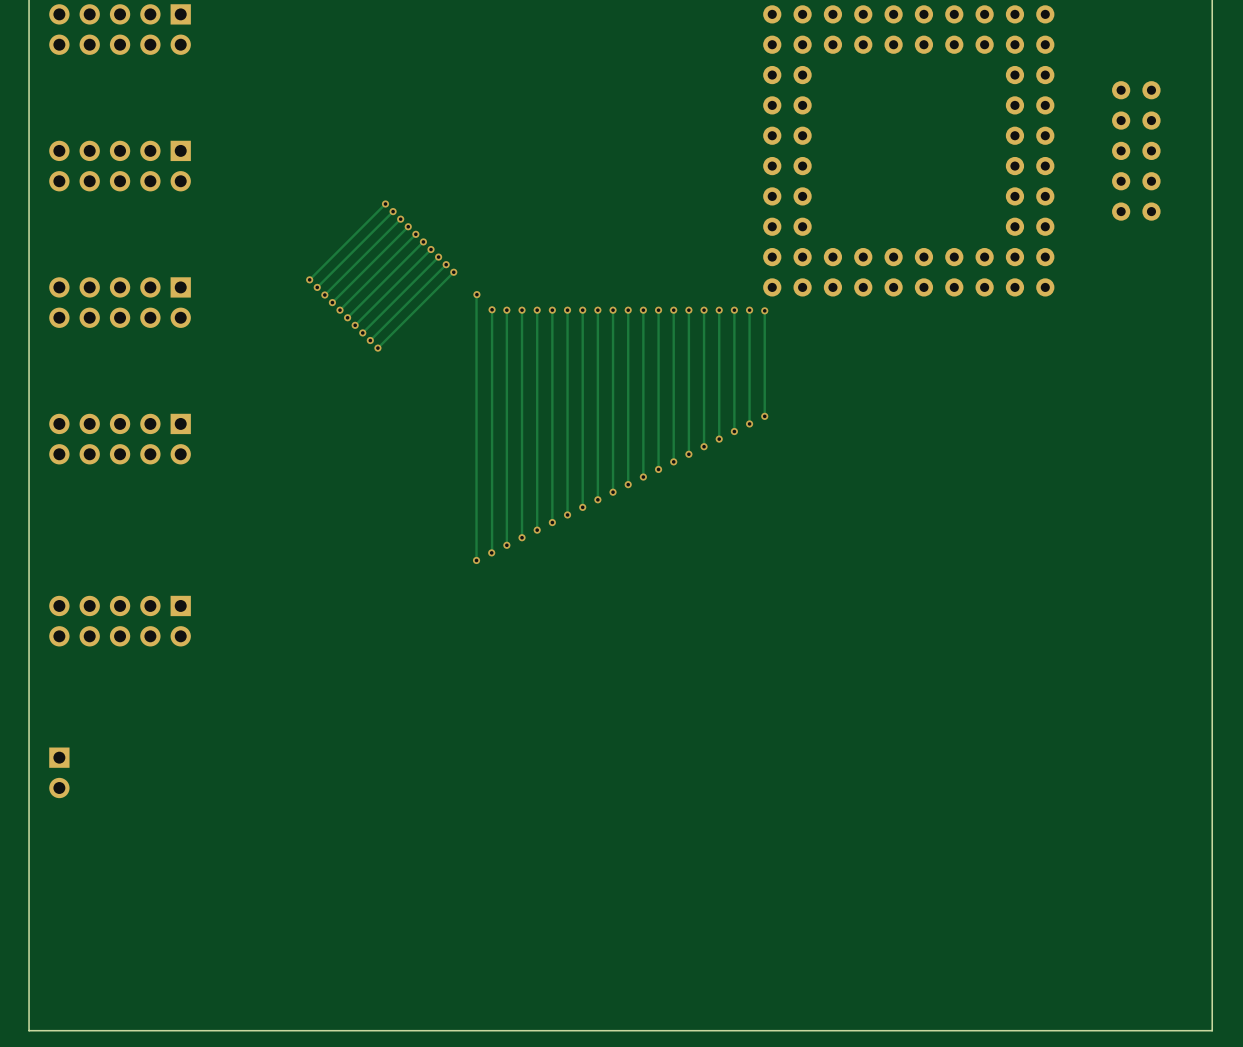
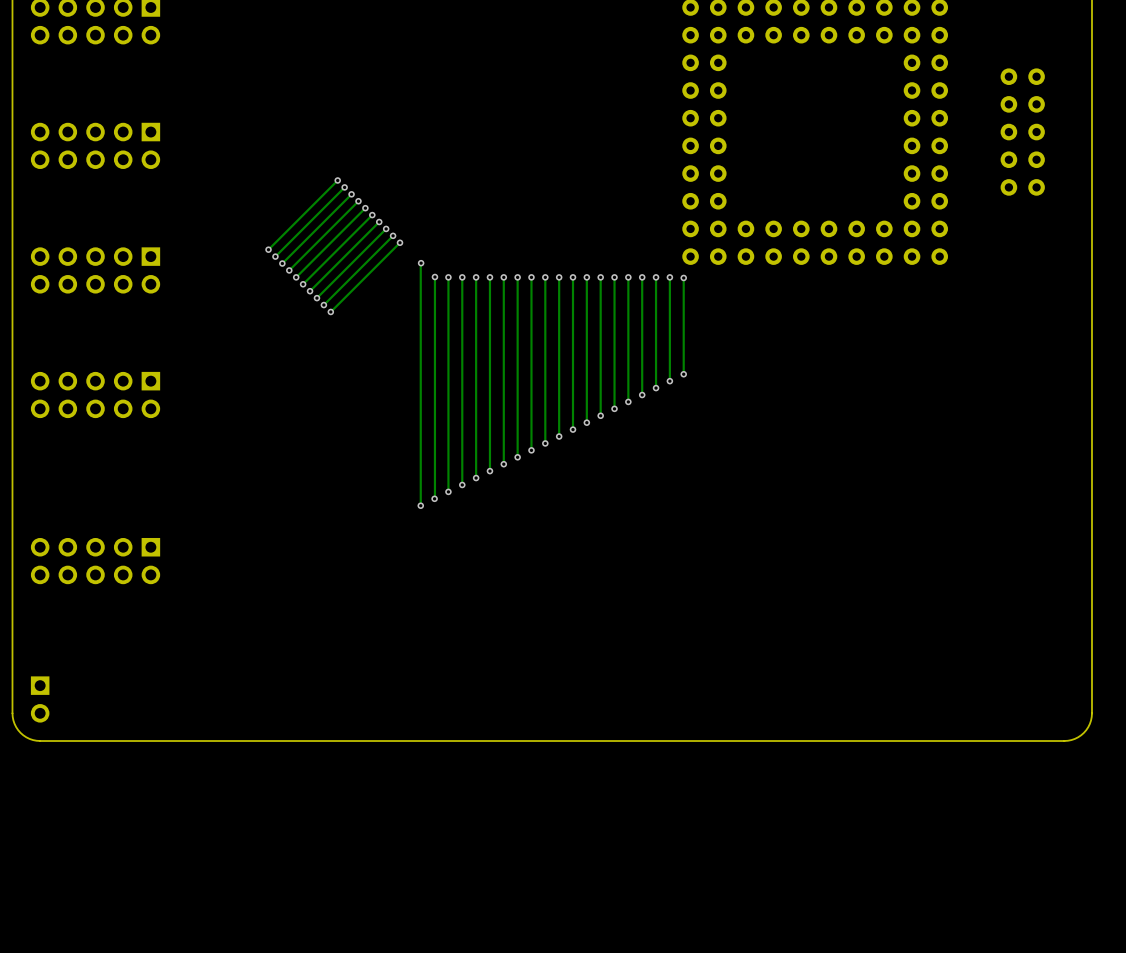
board edge: (1212, 788) (1212, 1030) (29, 1030) (29, 788) -> (1091, 713) (1089, 723) (1083, 732) (1074, 738) (1064, 741) (40, 741) (29, 738) (20, 732) (14, 723) (12, 713)

